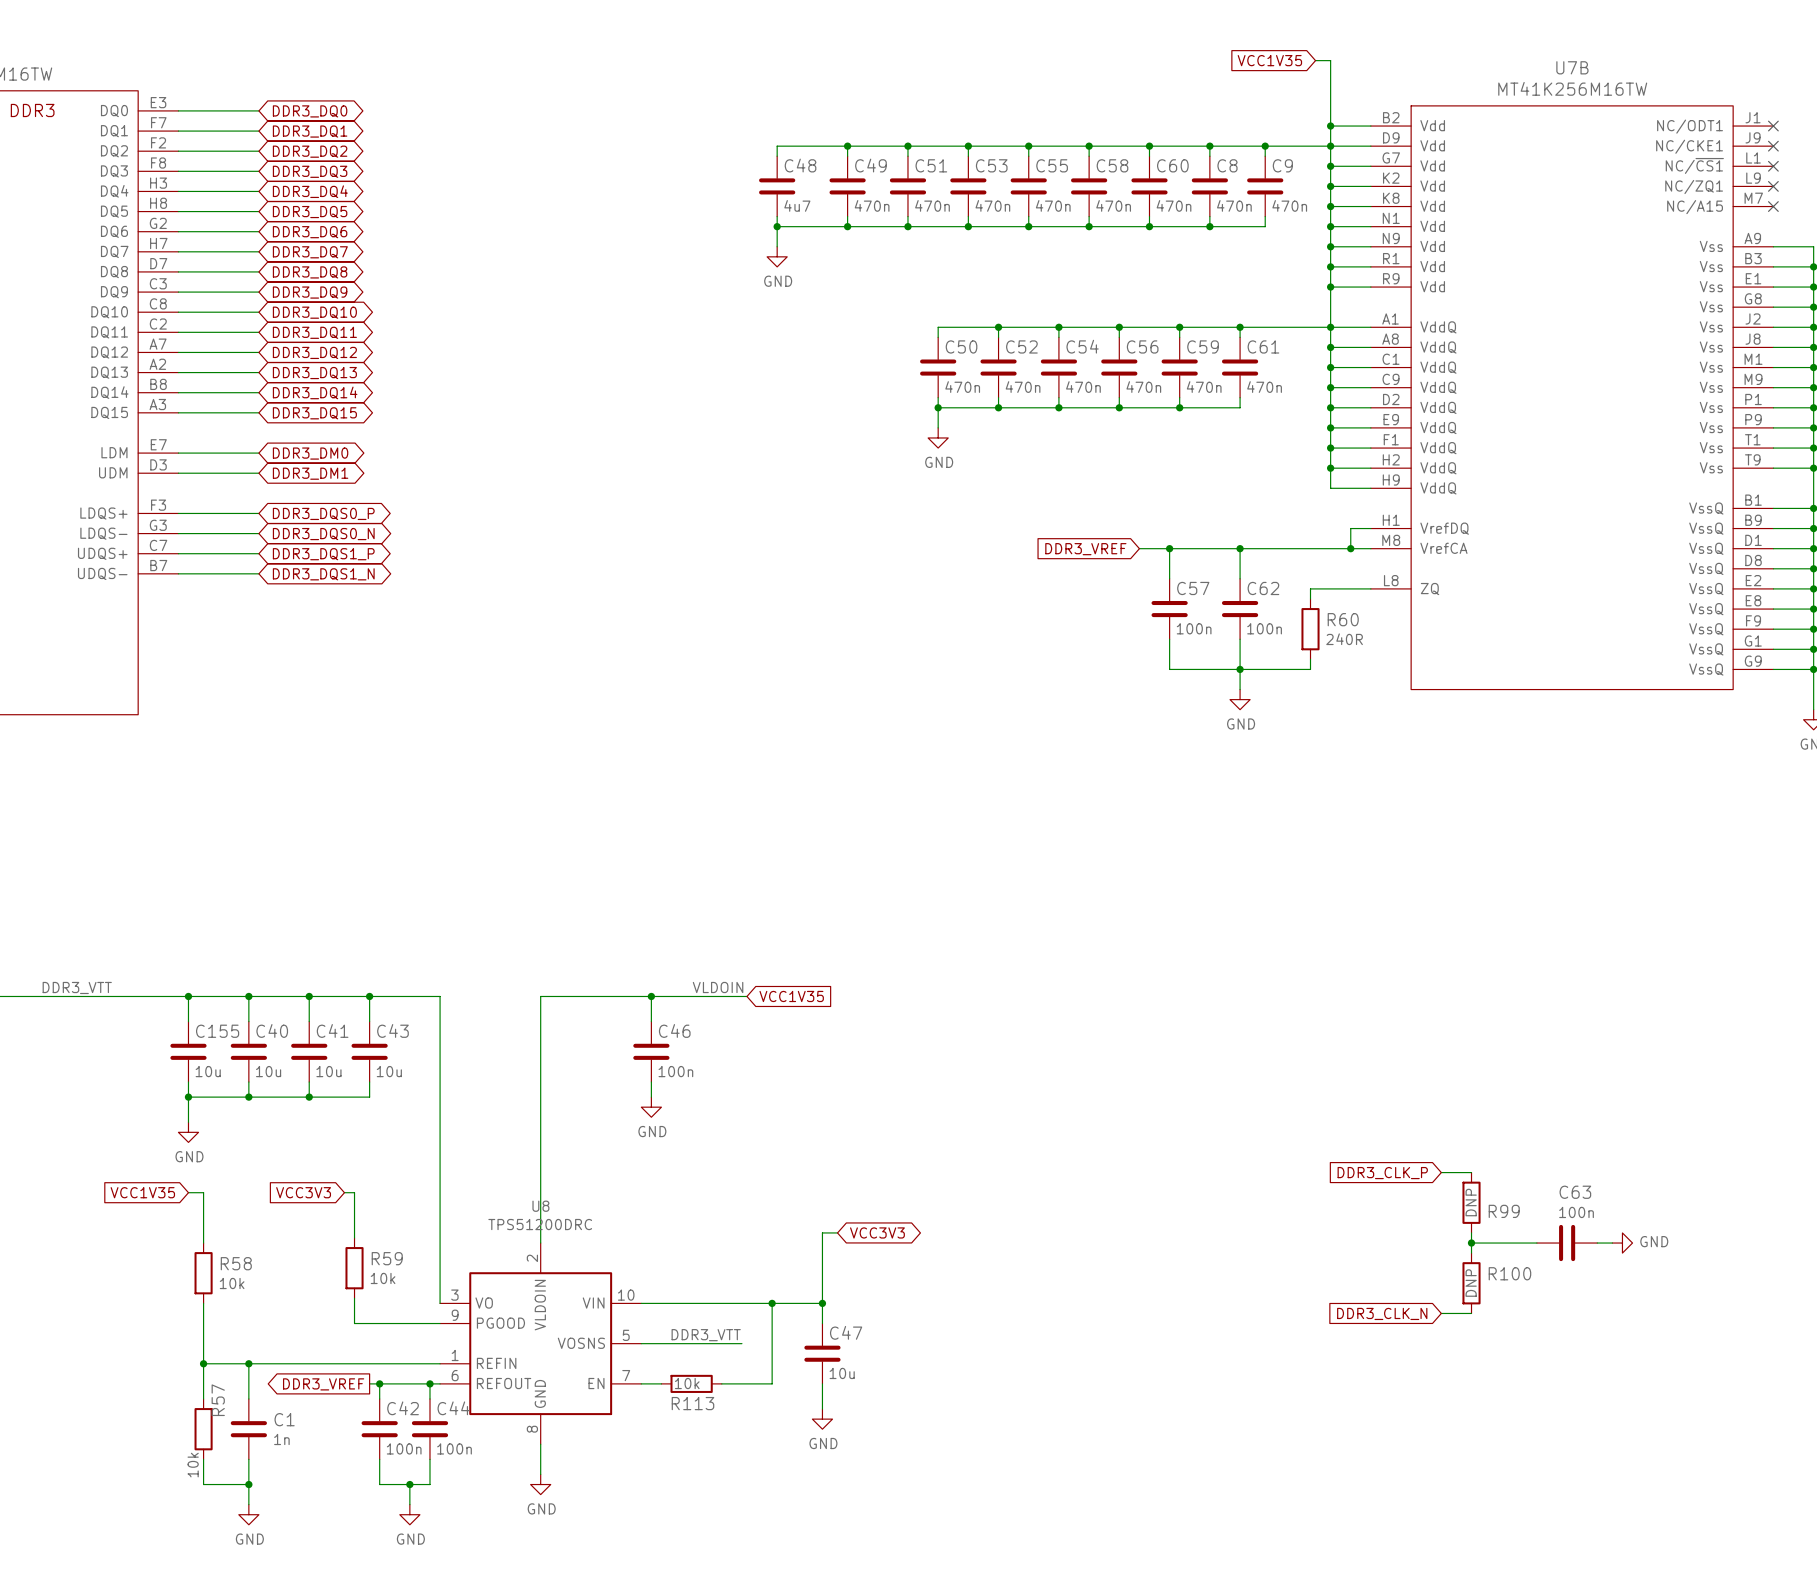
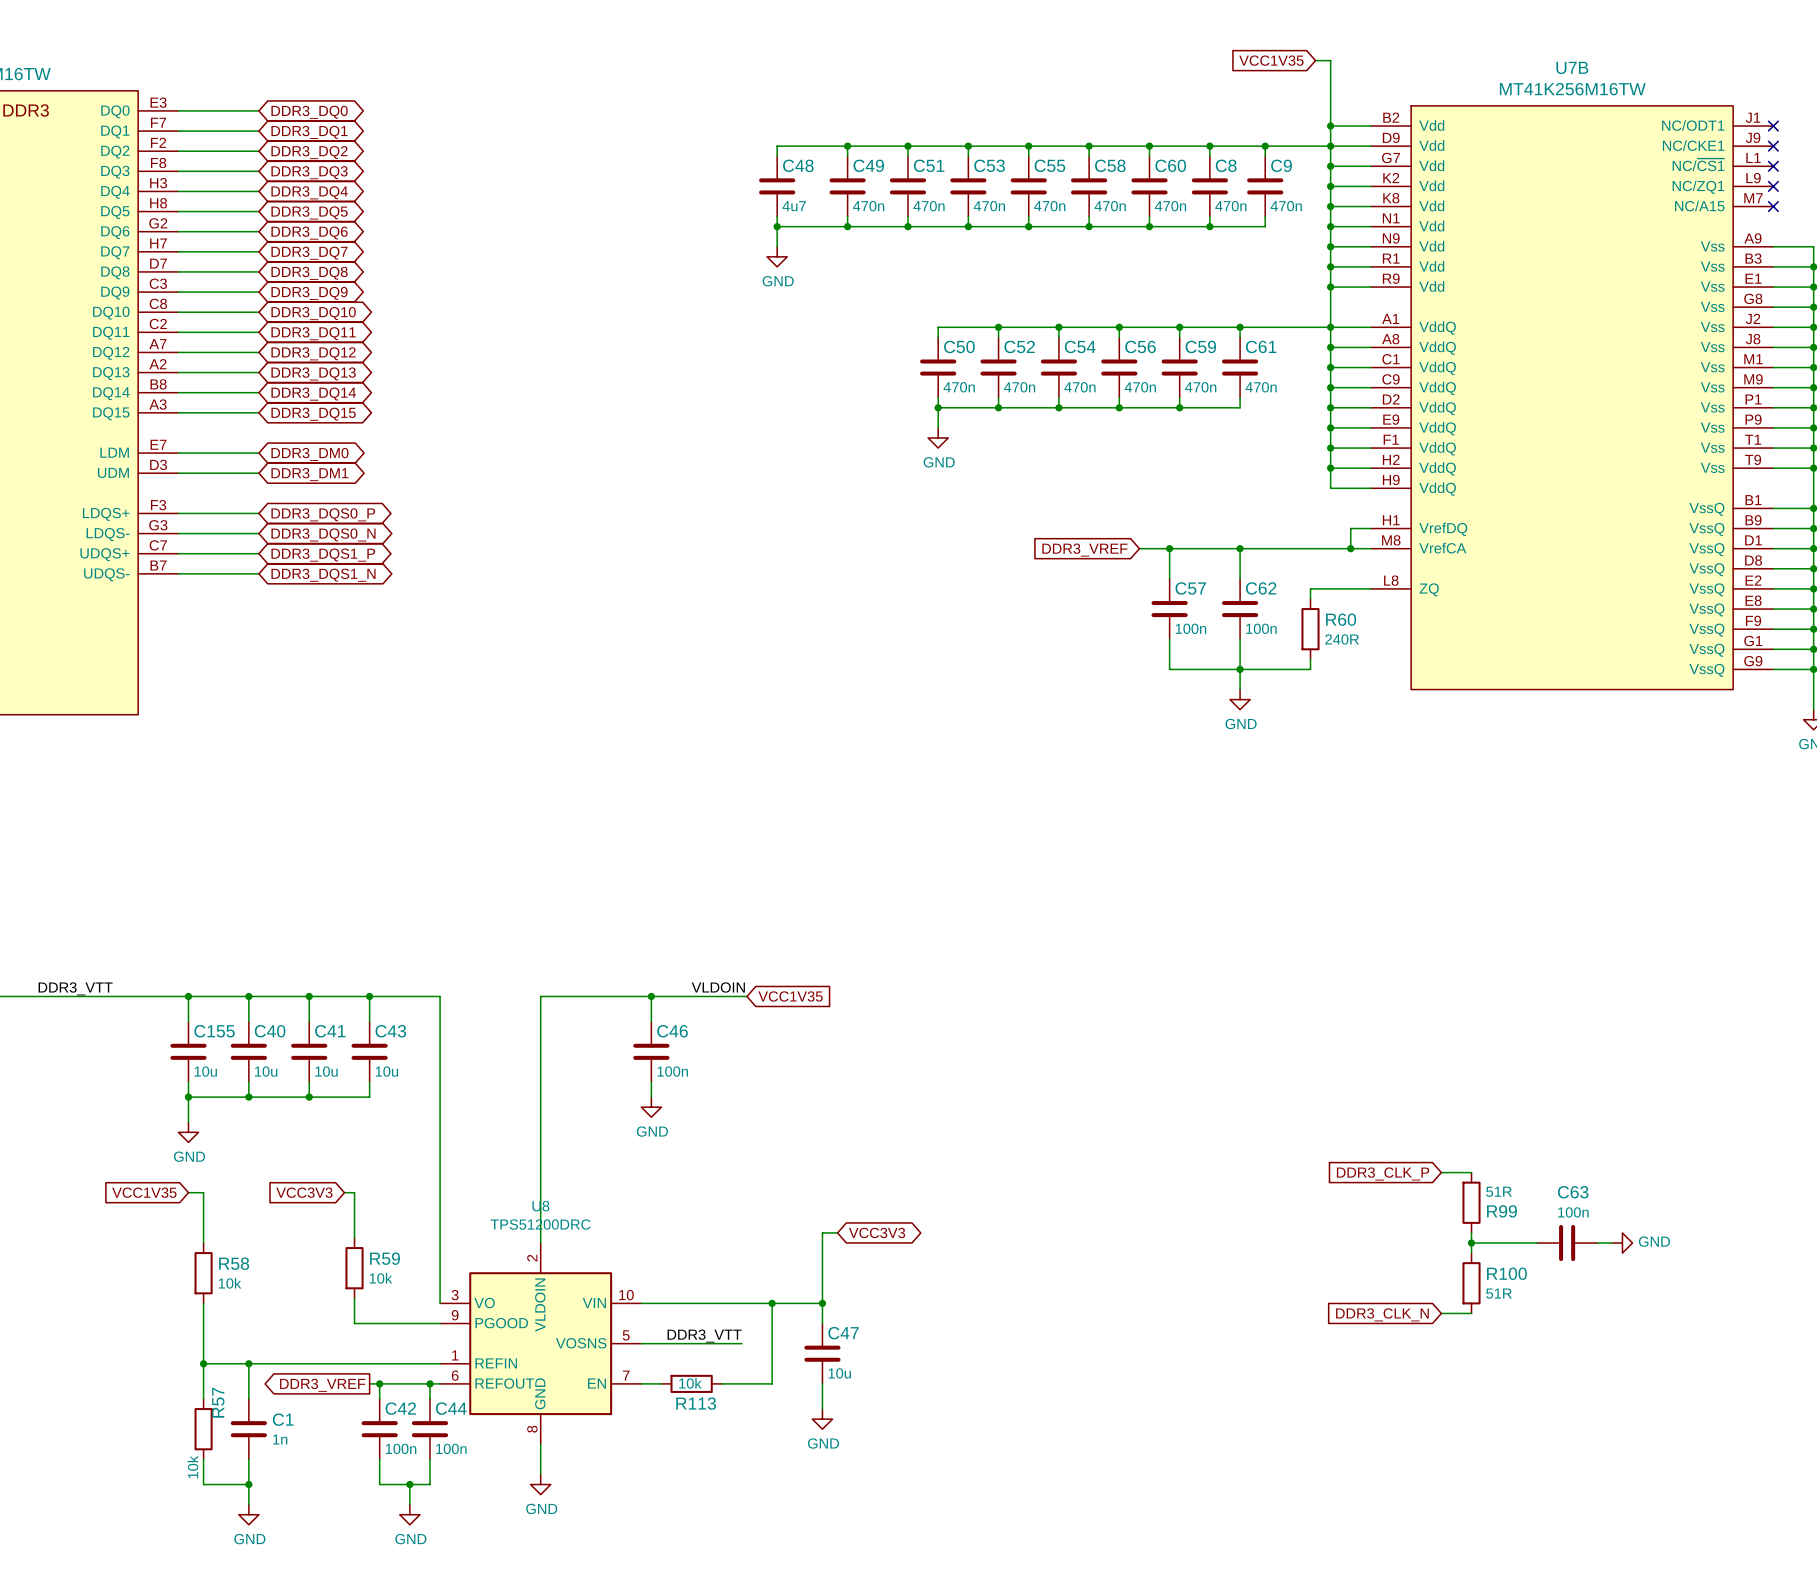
R99 text: none -> 51R (1498, 1191)
R99 text: DNP (1471, 1202) -> none
R100 text: DNP (1471, 1283) -> none
R100 text: none -> 51R (1498, 1293)

